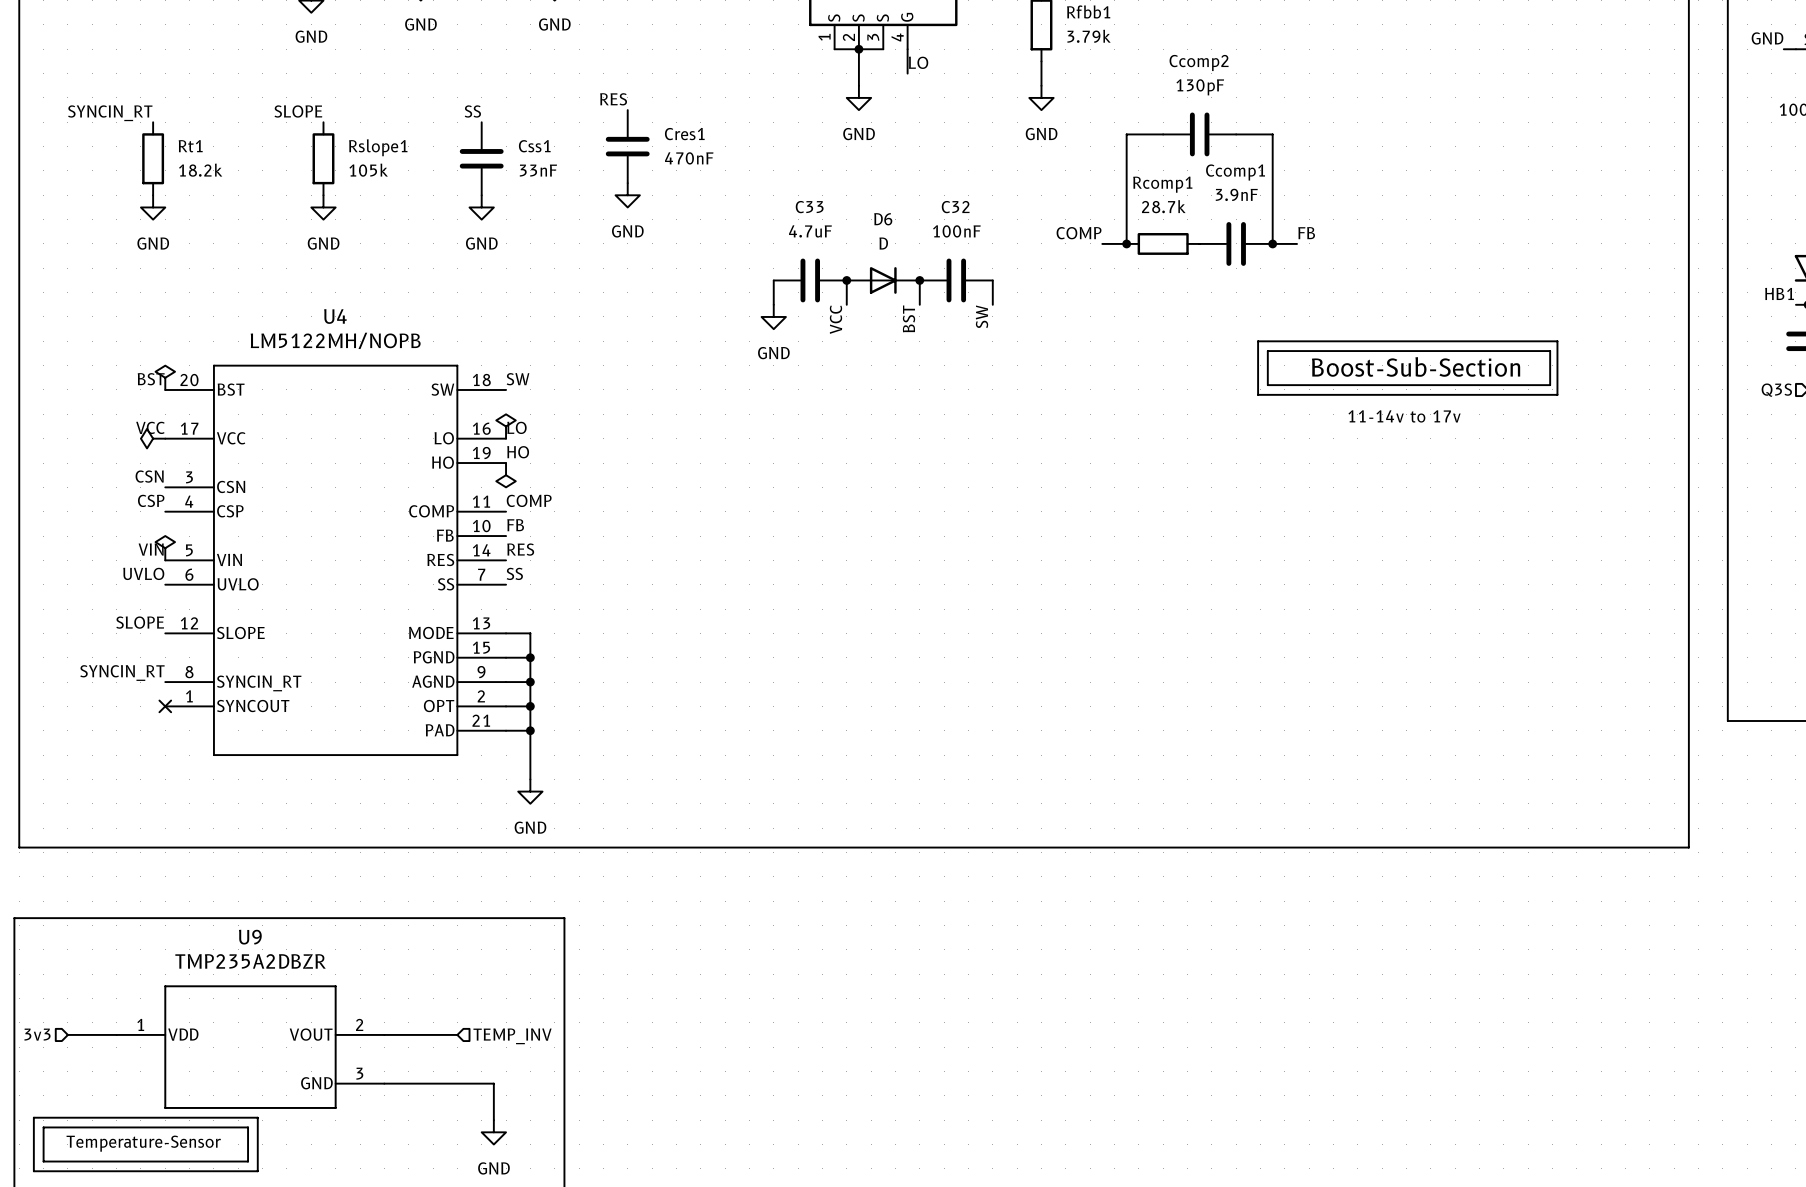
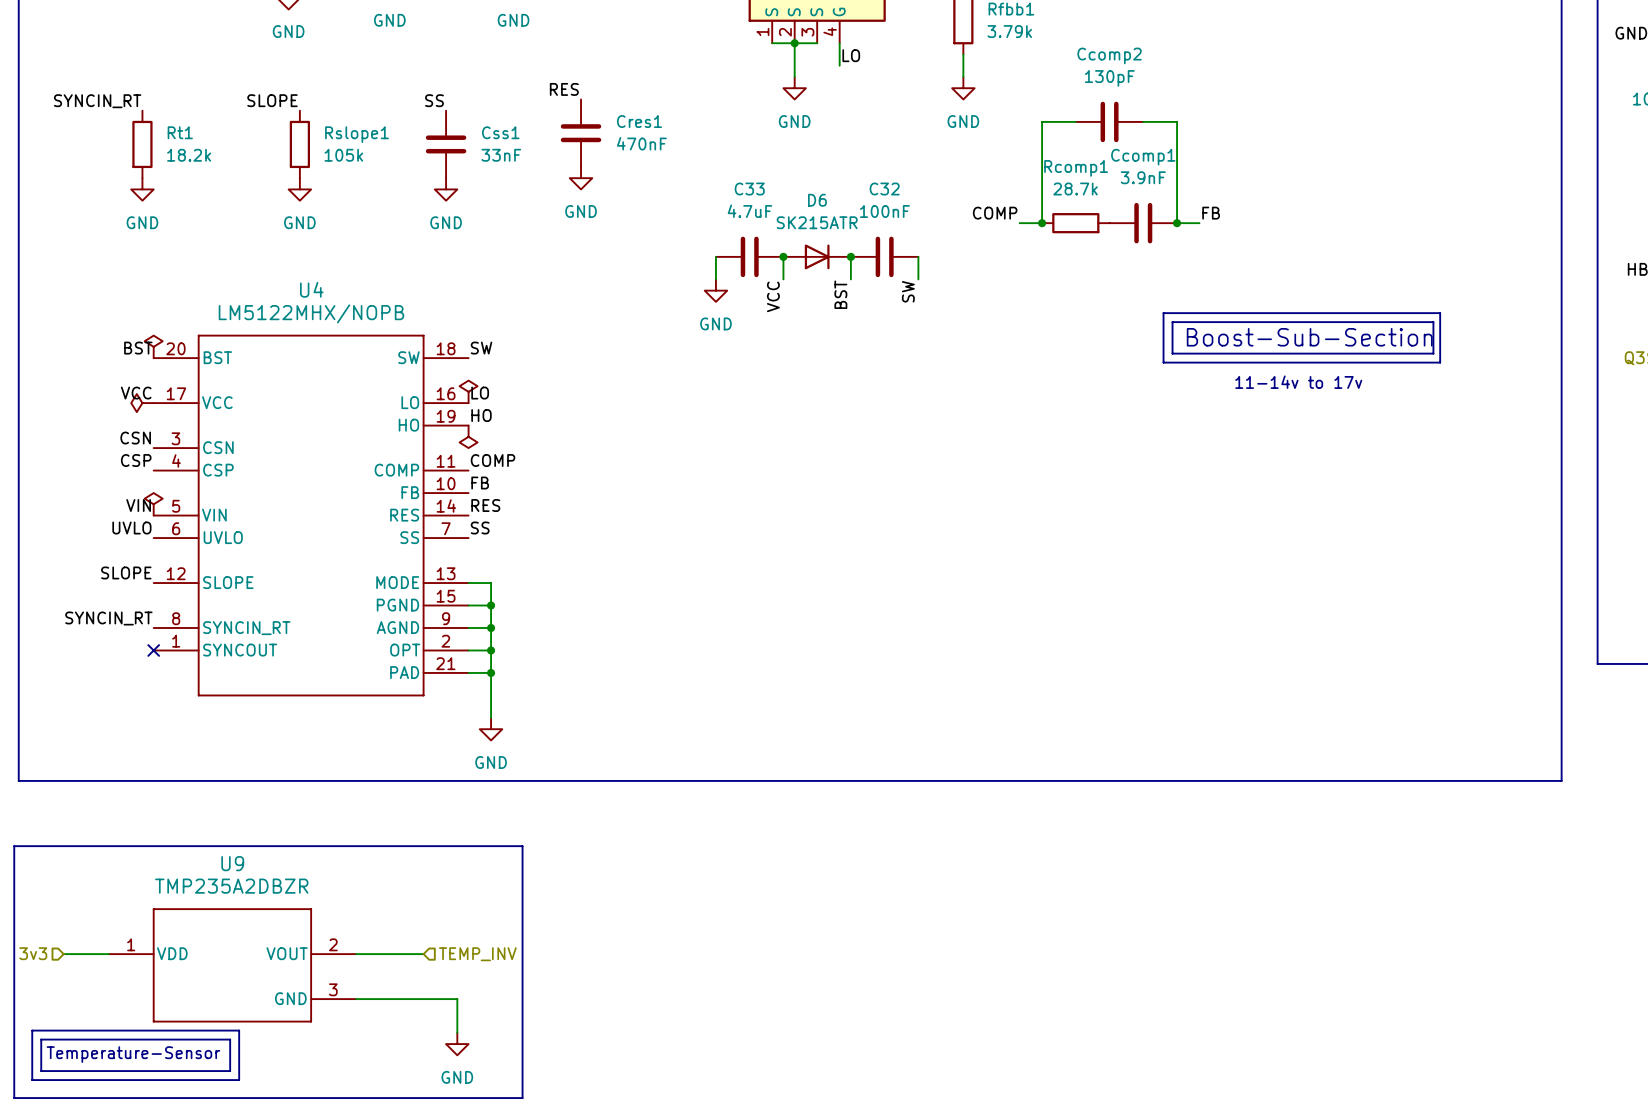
D6 value: D (883, 243) -> SK215ATR (817, 222)
U4 value: LM5122MH/NOPB (335, 340) -> LM5122MHX/NOPB (311, 313)

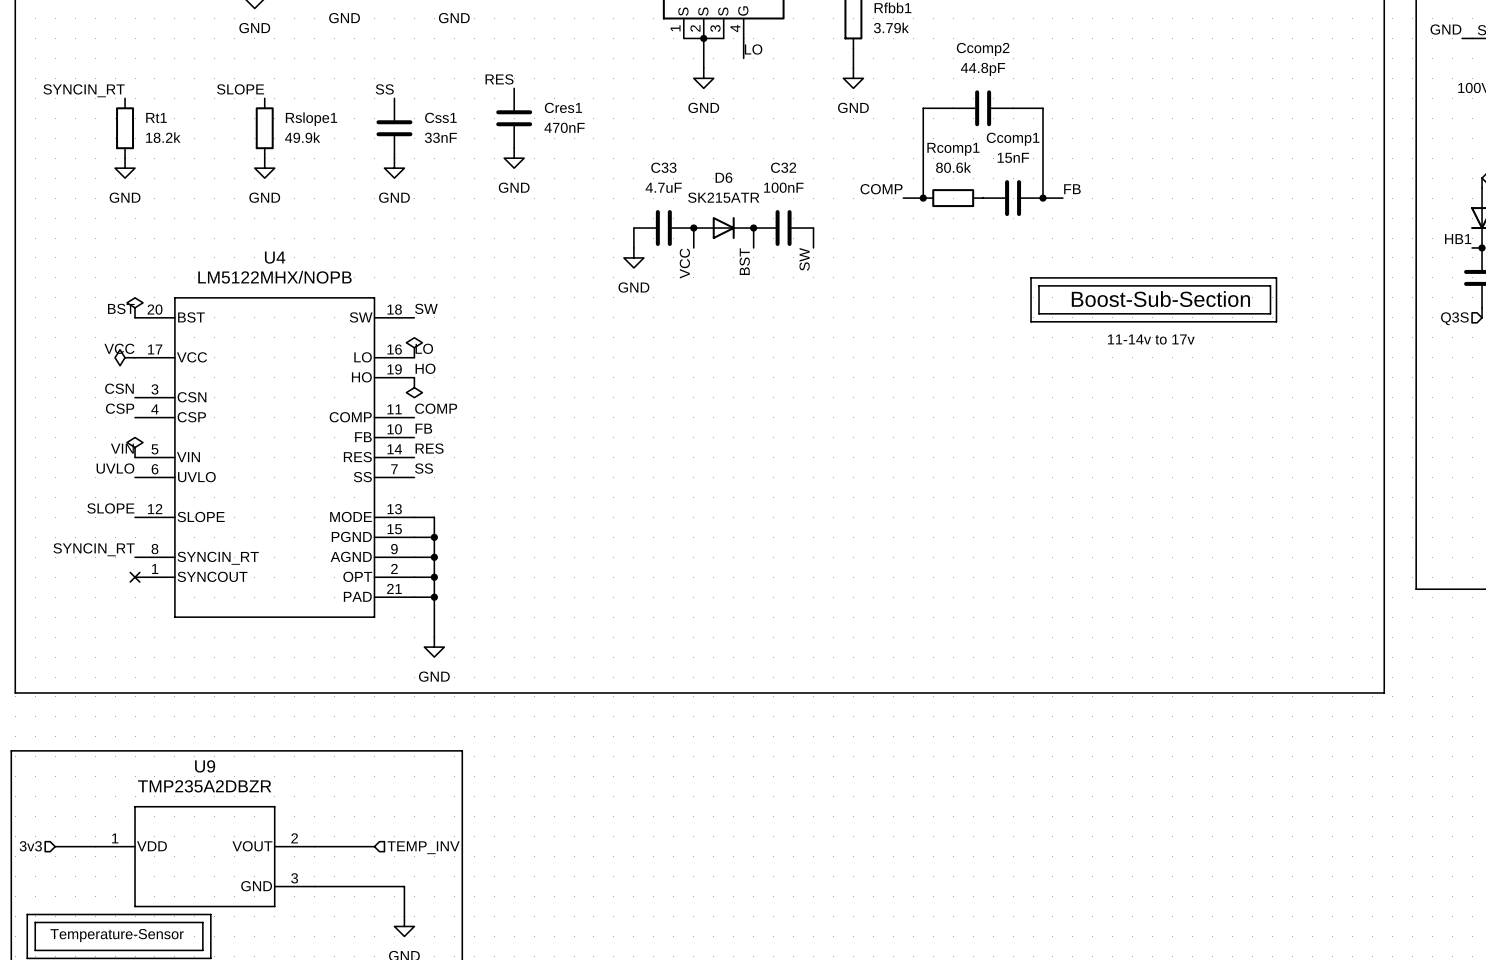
Ccomp2 value: 130pF (1109, 78) -> 44.8pF (983, 69)
Rslope1 value: 105k (343, 155) -> 49.9k (302, 137)
Ccomp1 value: 3.9nF (1143, 177) -> 15nF (1013, 157)
Rcomp1 value: 28.7k (1075, 189) -> 80.6k (953, 167)

